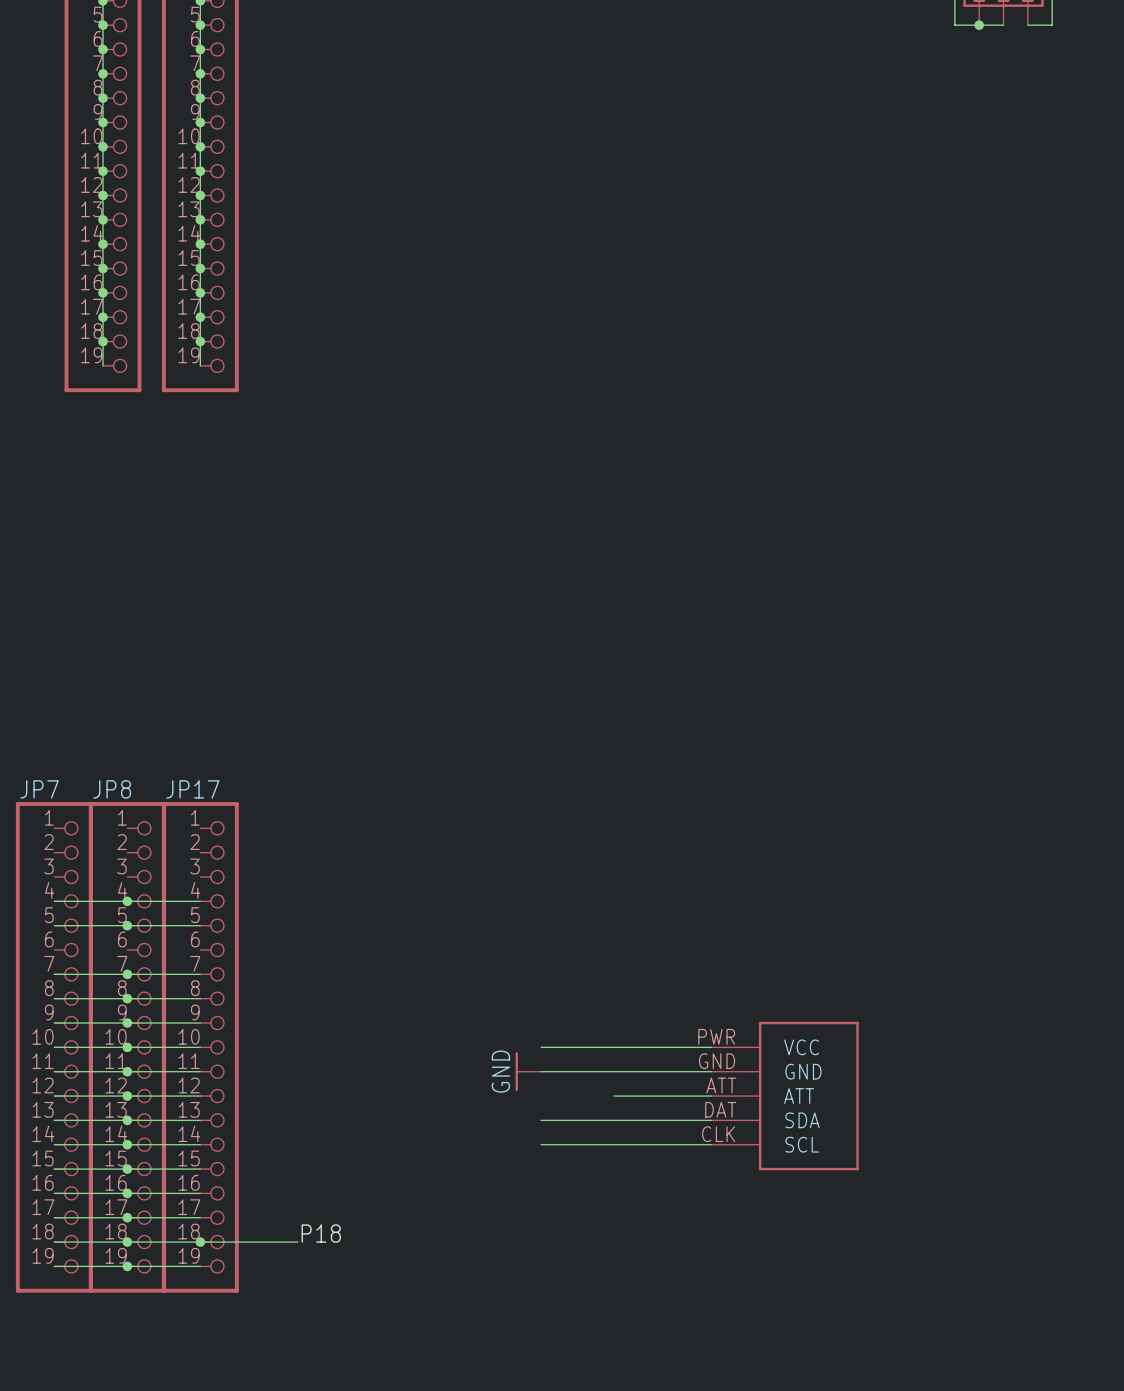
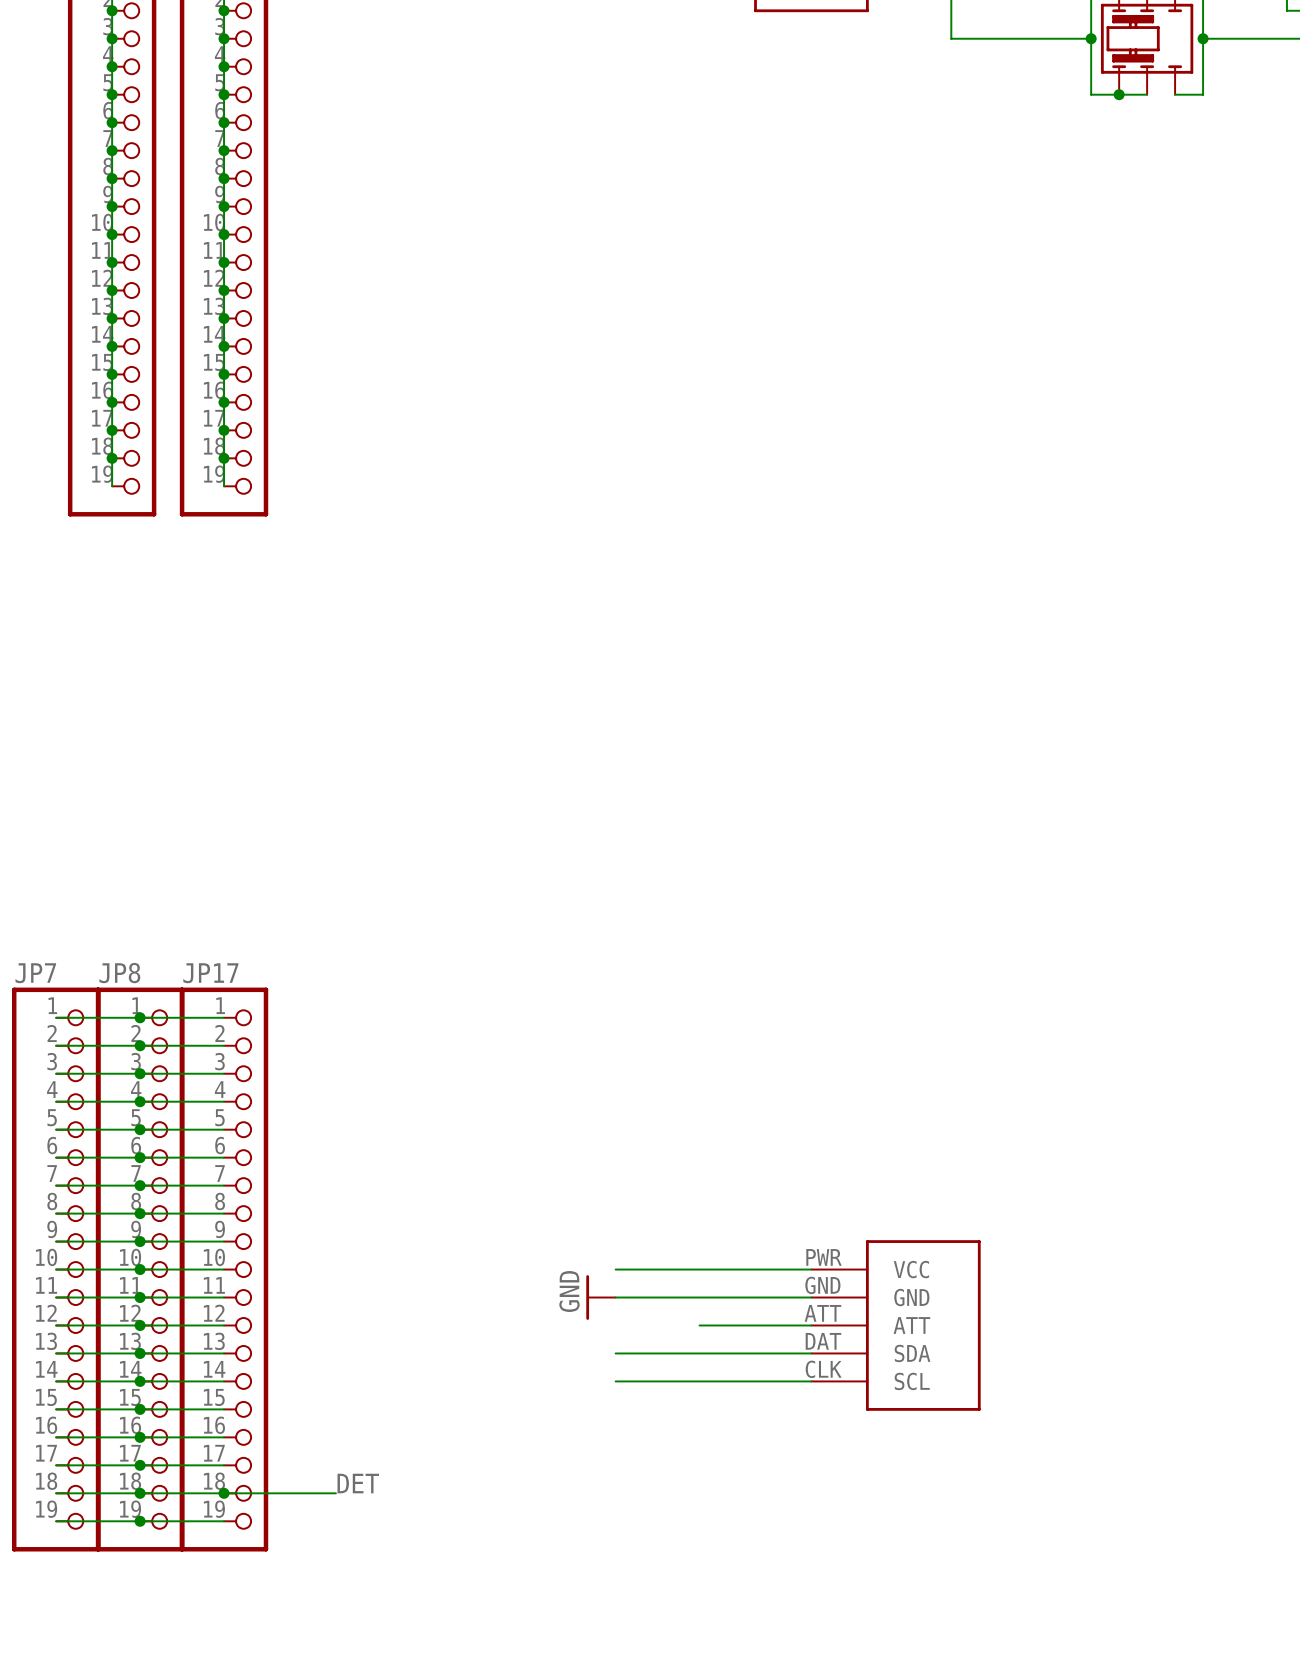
wire: none -> (56, 1017) (224, 1017)
junction: none -> (140, 1017)
wire: none -> (56, 1045) (224, 1045)
junction: none -> (140, 1045)
wire: none -> (56, 1073) (224, 1073)
junction: none -> (140, 1073)
wire: none -> (56, 1157) (224, 1157)
junction: none -> (140, 1157)
label: P18 (321, 1233) -> DET (358, 1483)

